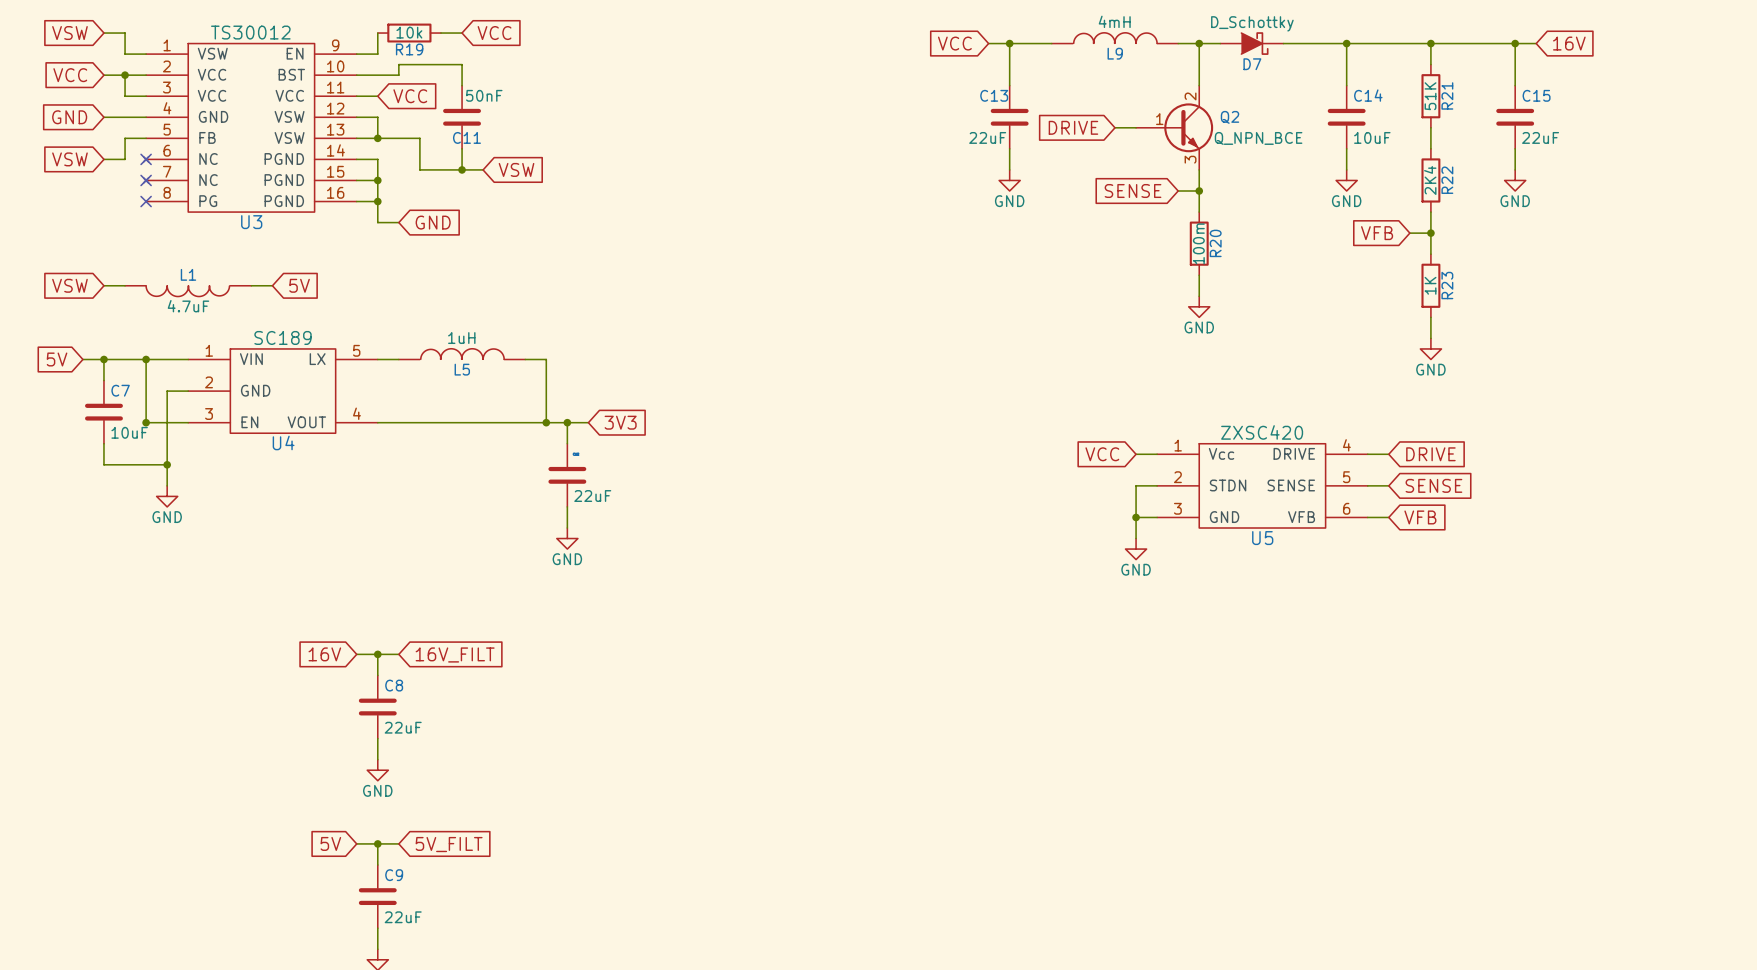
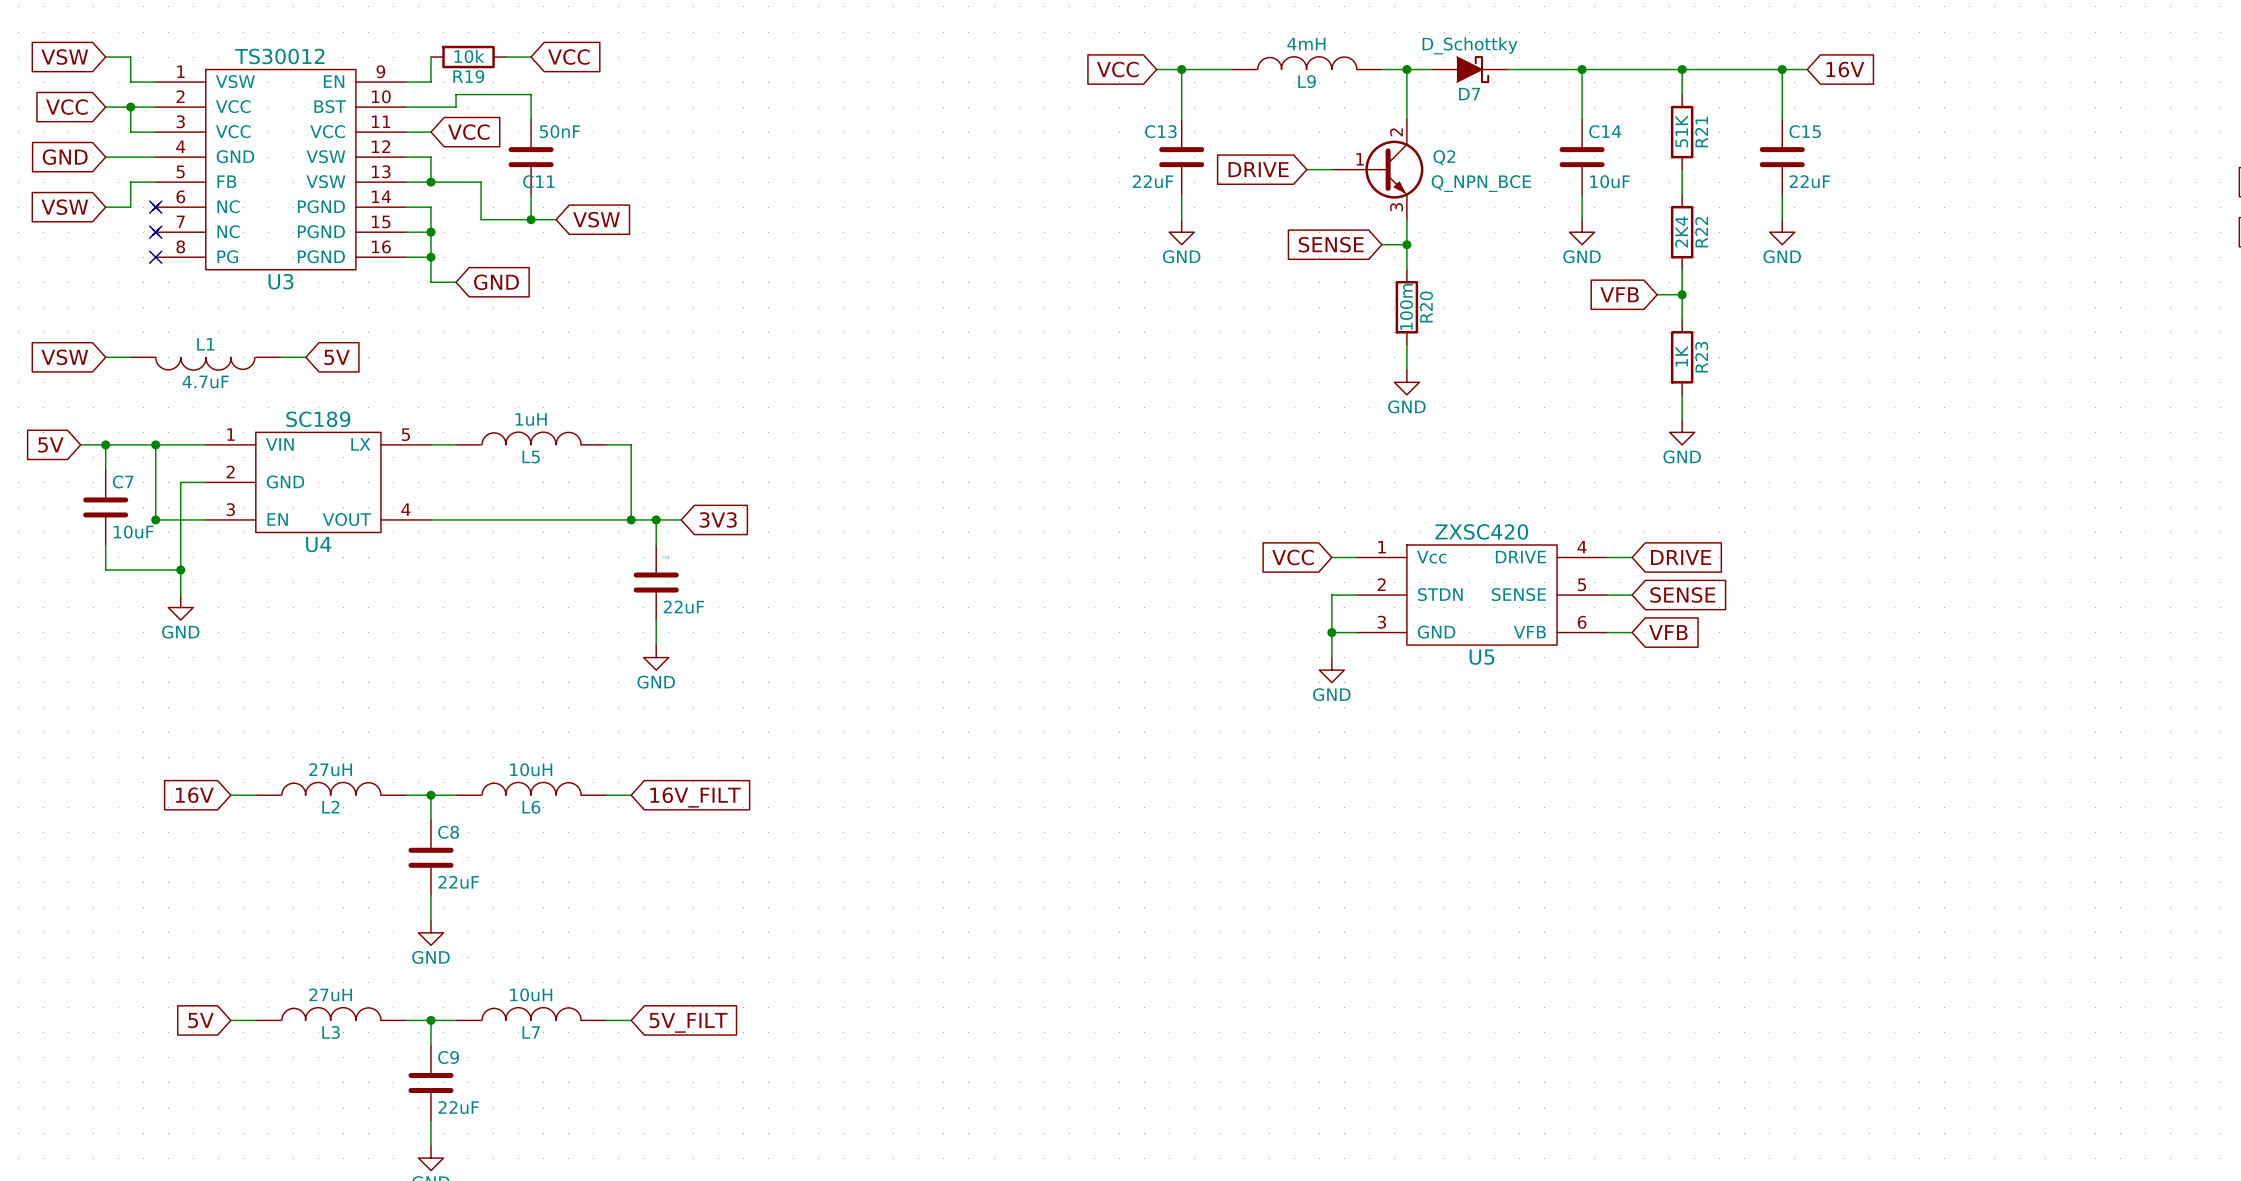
L2: none -> 27uH (330, 788)
L6: none -> 10uH (531, 788)
wire: none -> (230, 795) (255, 795)
global label position: 16V (324, 654) -> 16V (194, 795)
global label position: 16V_FILT (455, 654) -> 16V_FILT (695, 797)
wire: none -> (606, 795) (631, 795)
L3: none -> 27uH (330, 1014)
L7: none -> 10uH (531, 1014)
wire: none -> (230, 1020) (255, 1020)
global label position: 5V (330, 843) -> 5V (201, 1020)
wire: none -> (606, 1020) (631, 1020)
global label position: 5V_FILT (449, 844) -> 5V_FILT (688, 1022)

